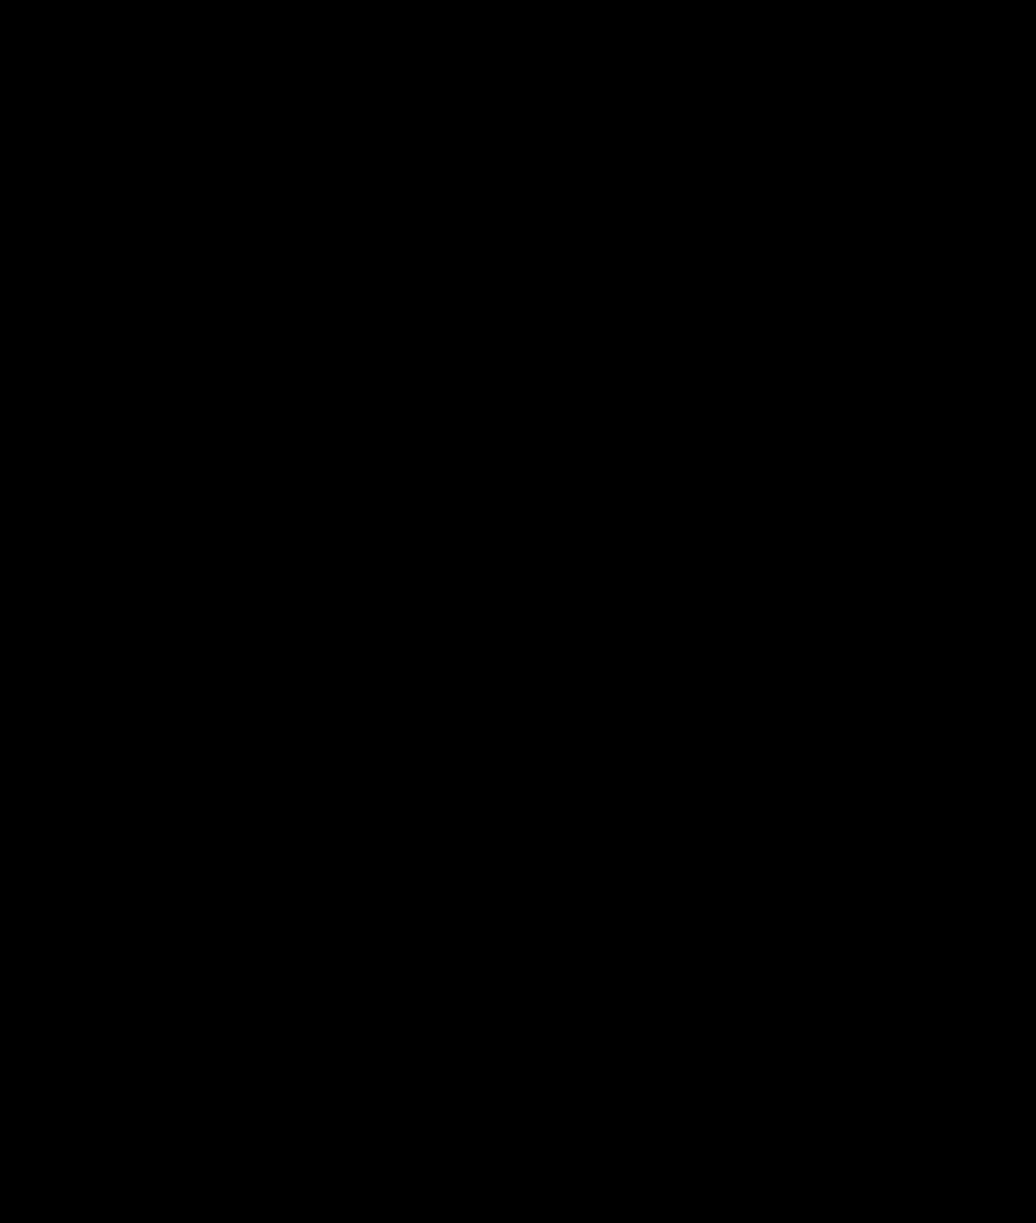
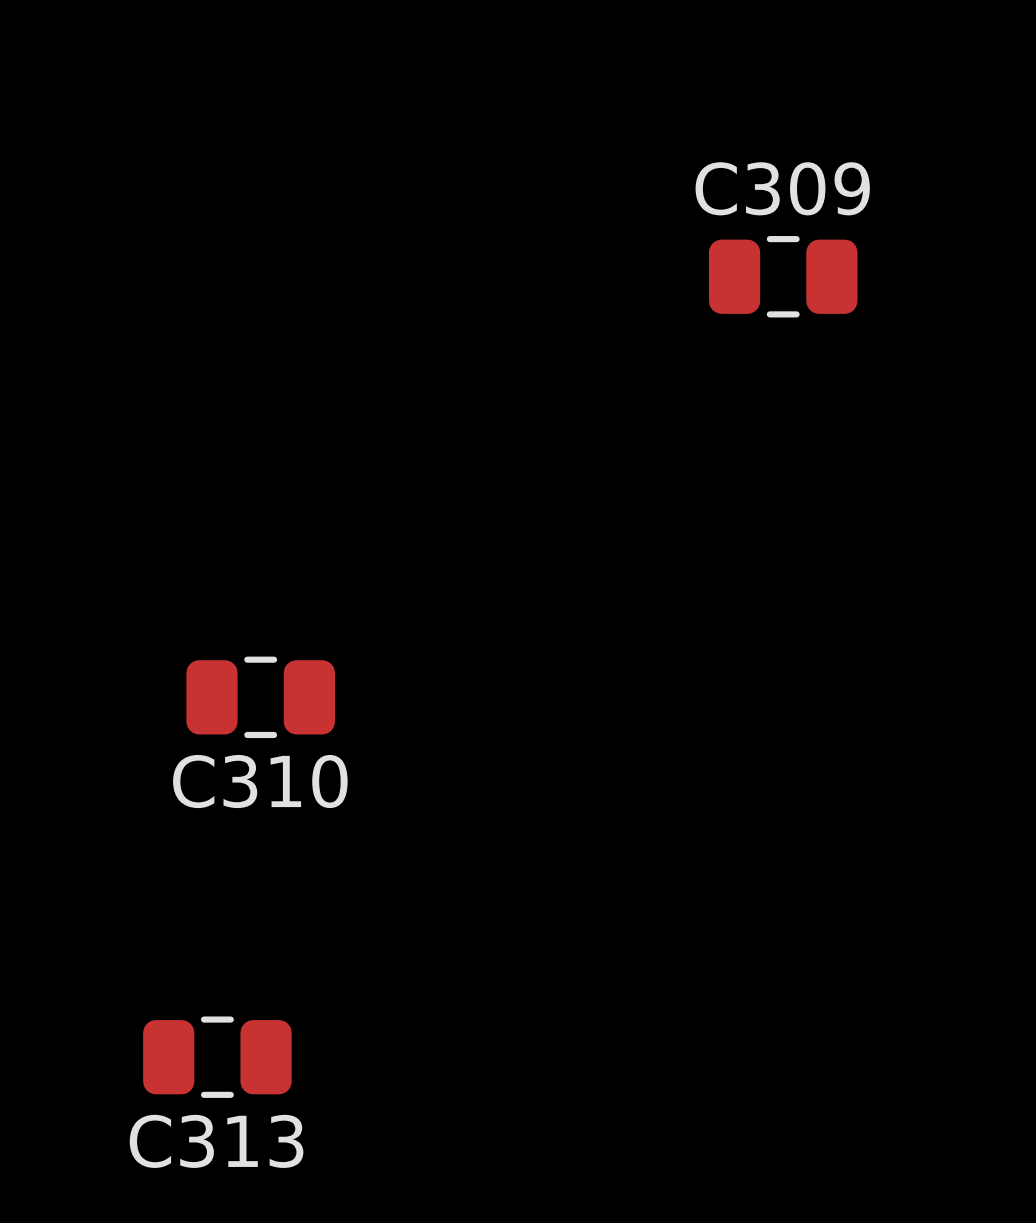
C309: none -> (783, 276)
C310: none -> (260, 697)
C313: none -> (217, 1057)

